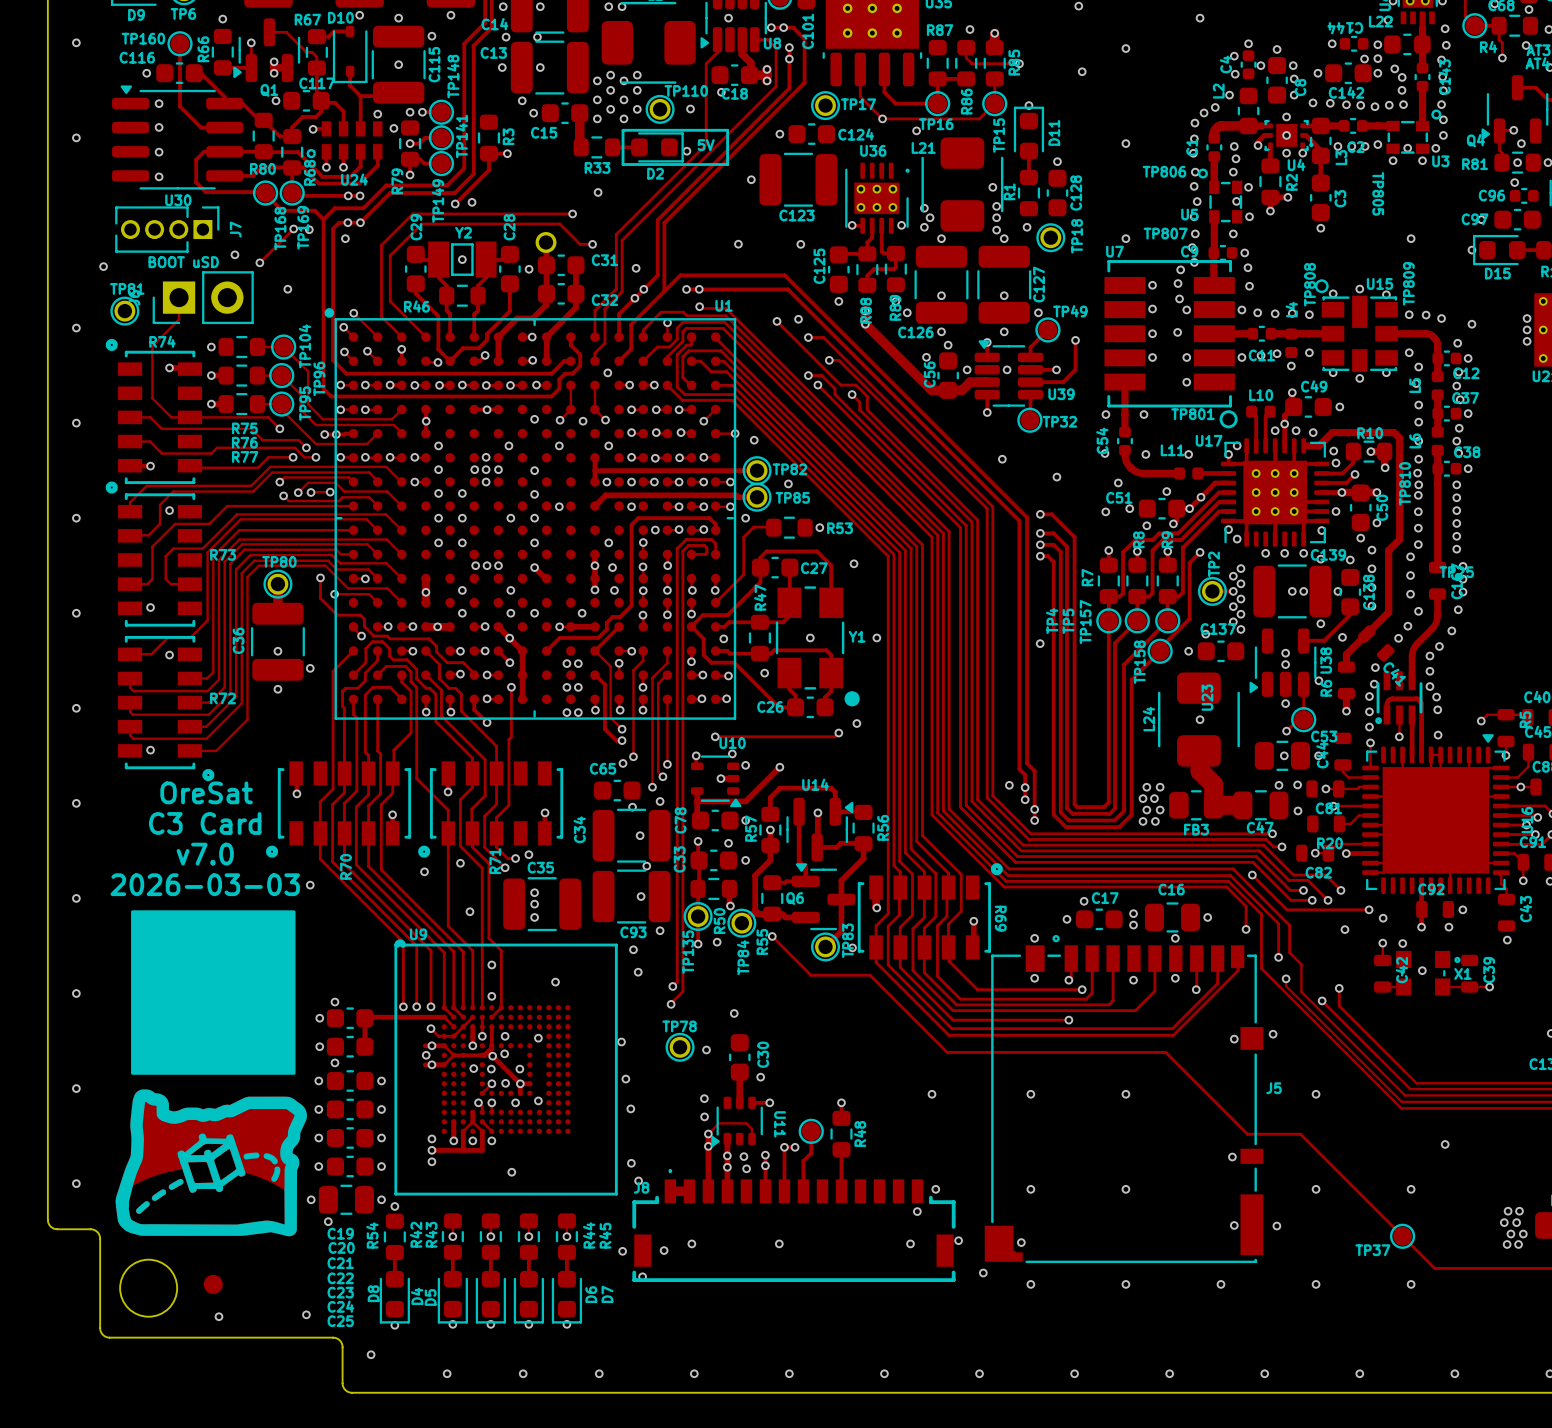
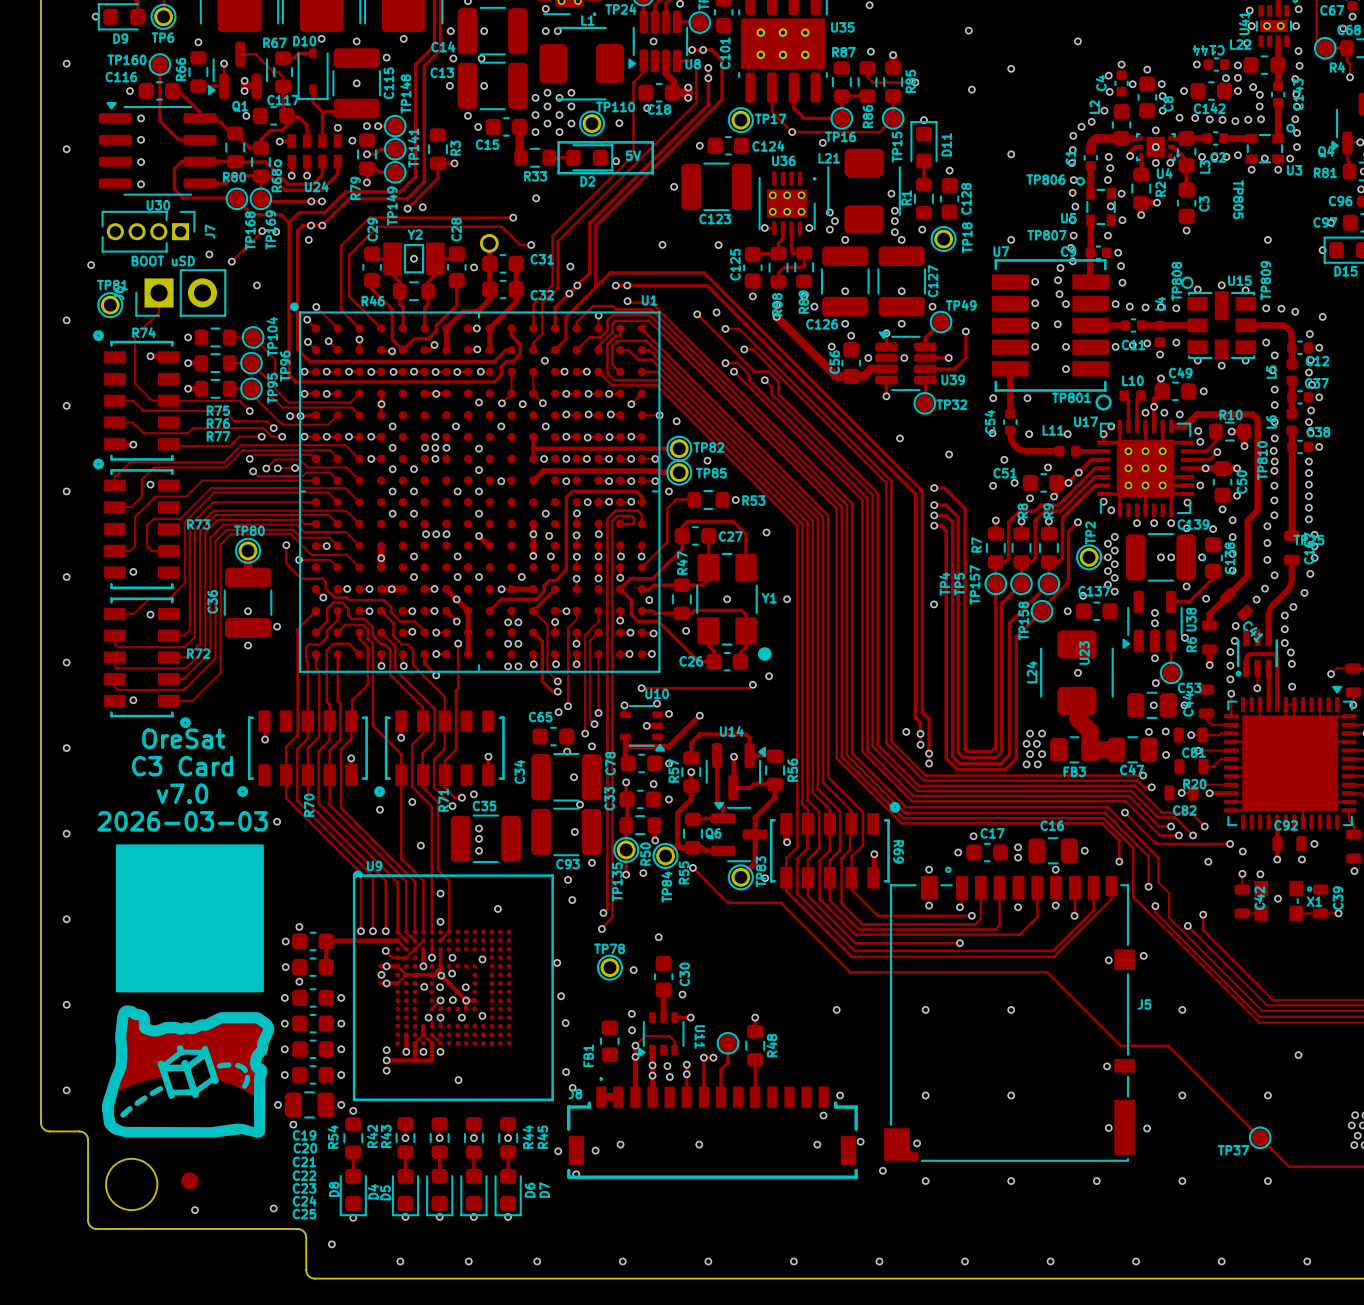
FB1: none -> (609, 1041)

